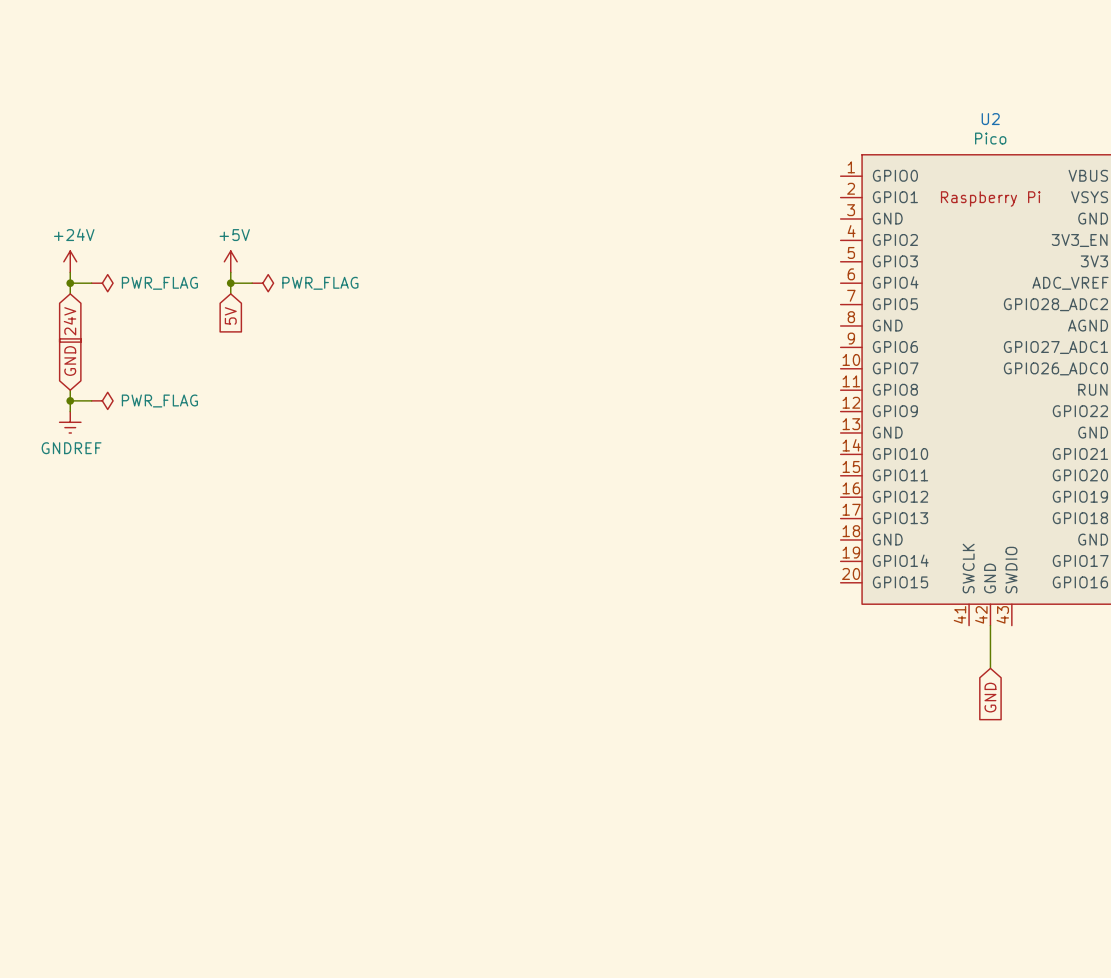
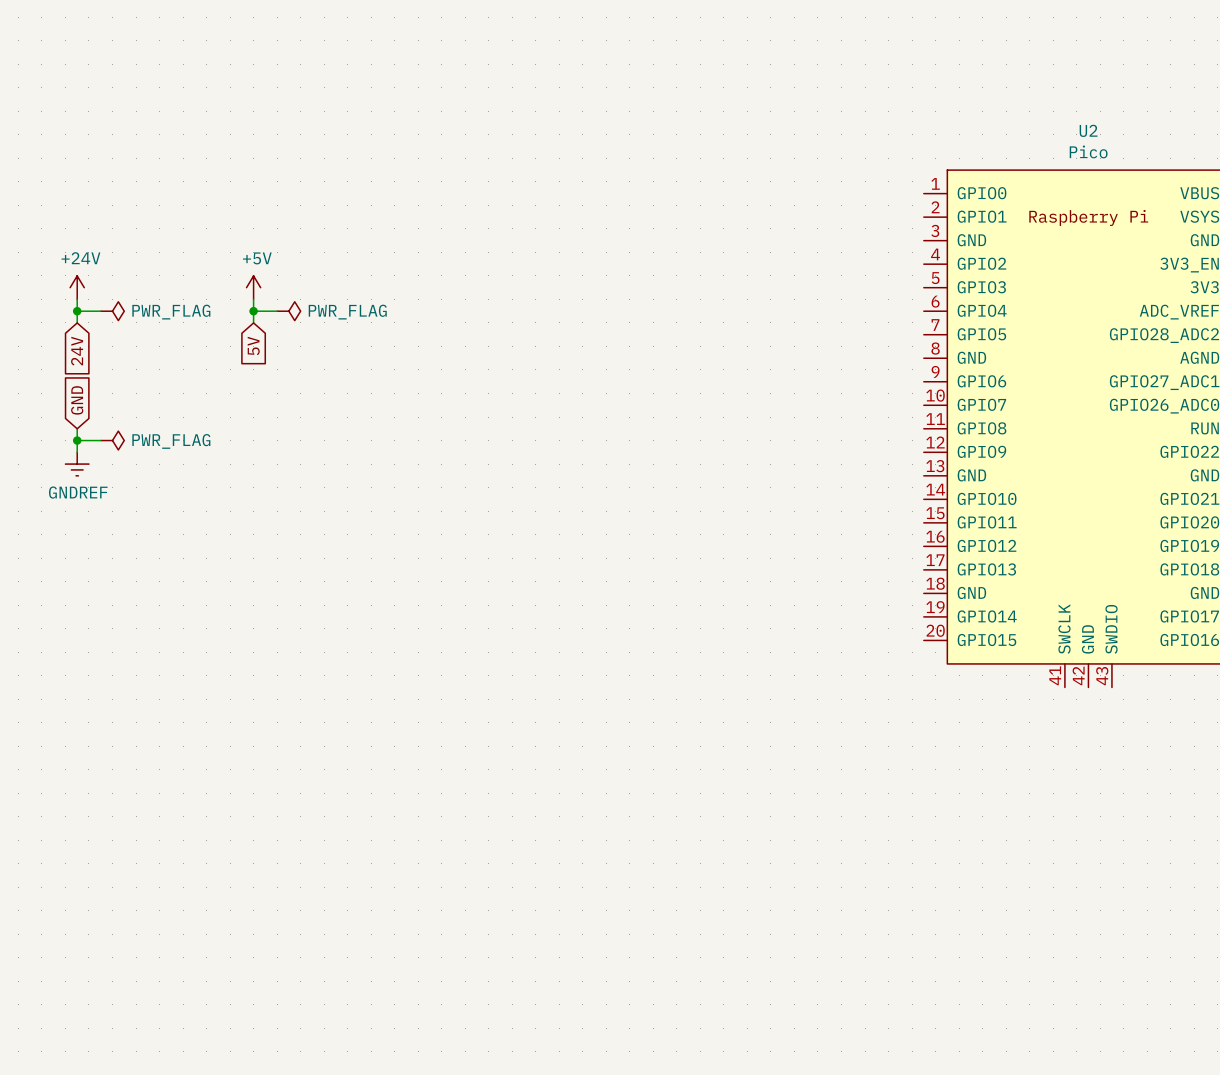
wire: (990, 625) (990, 668) -> none
global label: GND (990, 697) -> none

